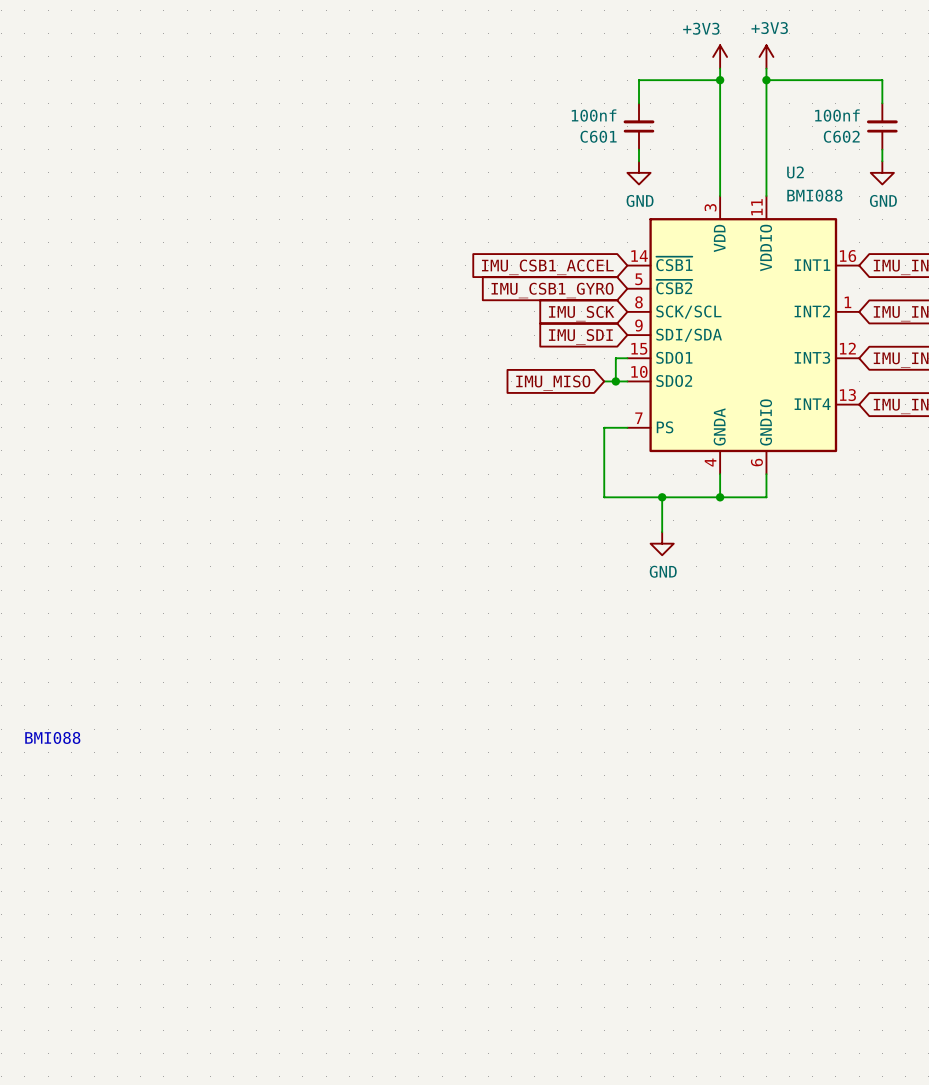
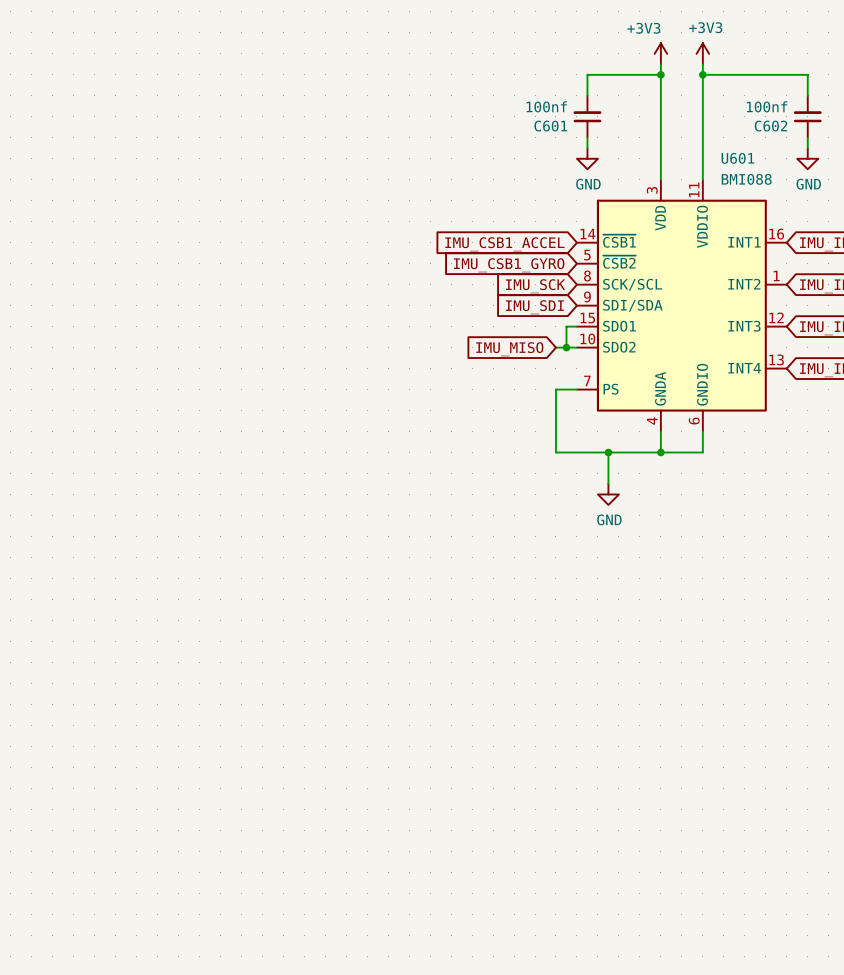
U2 name: U2 (795, 172) -> U601 (737, 158)
text: BMI088 (52, 737) -> none

